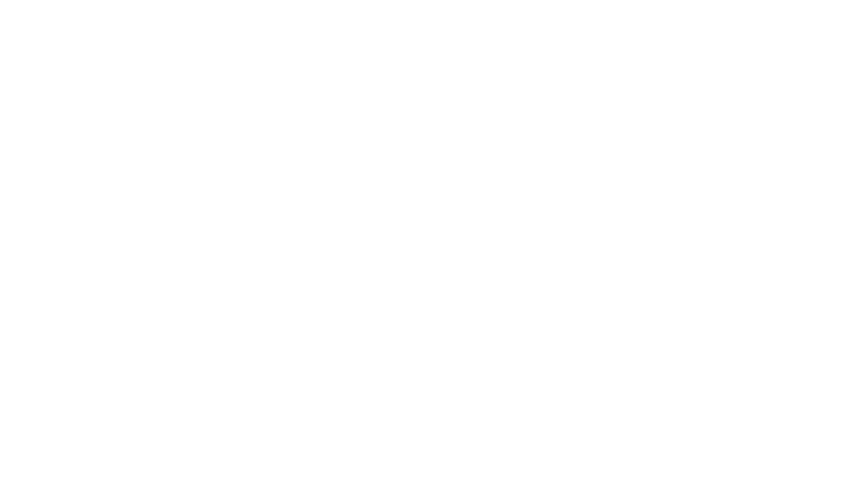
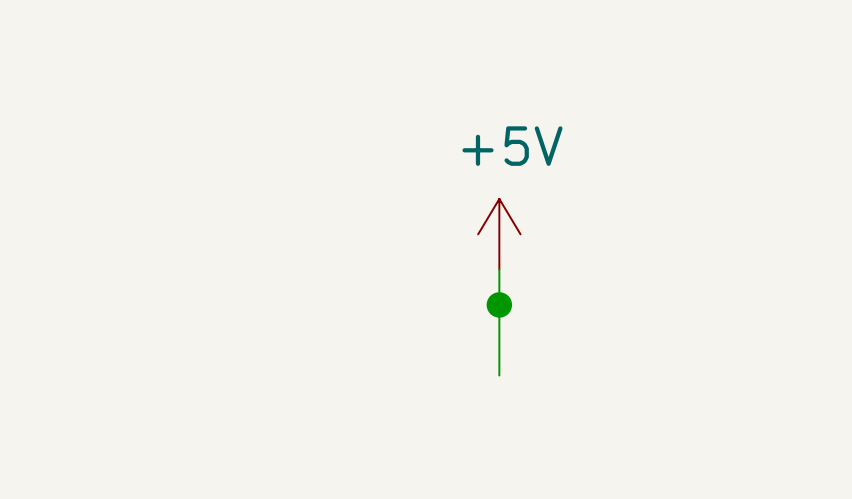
power symbol: none -> +5V (499, 234)
wire: none -> (499, 269) (499, 375)
junction: none -> (499, 304)

